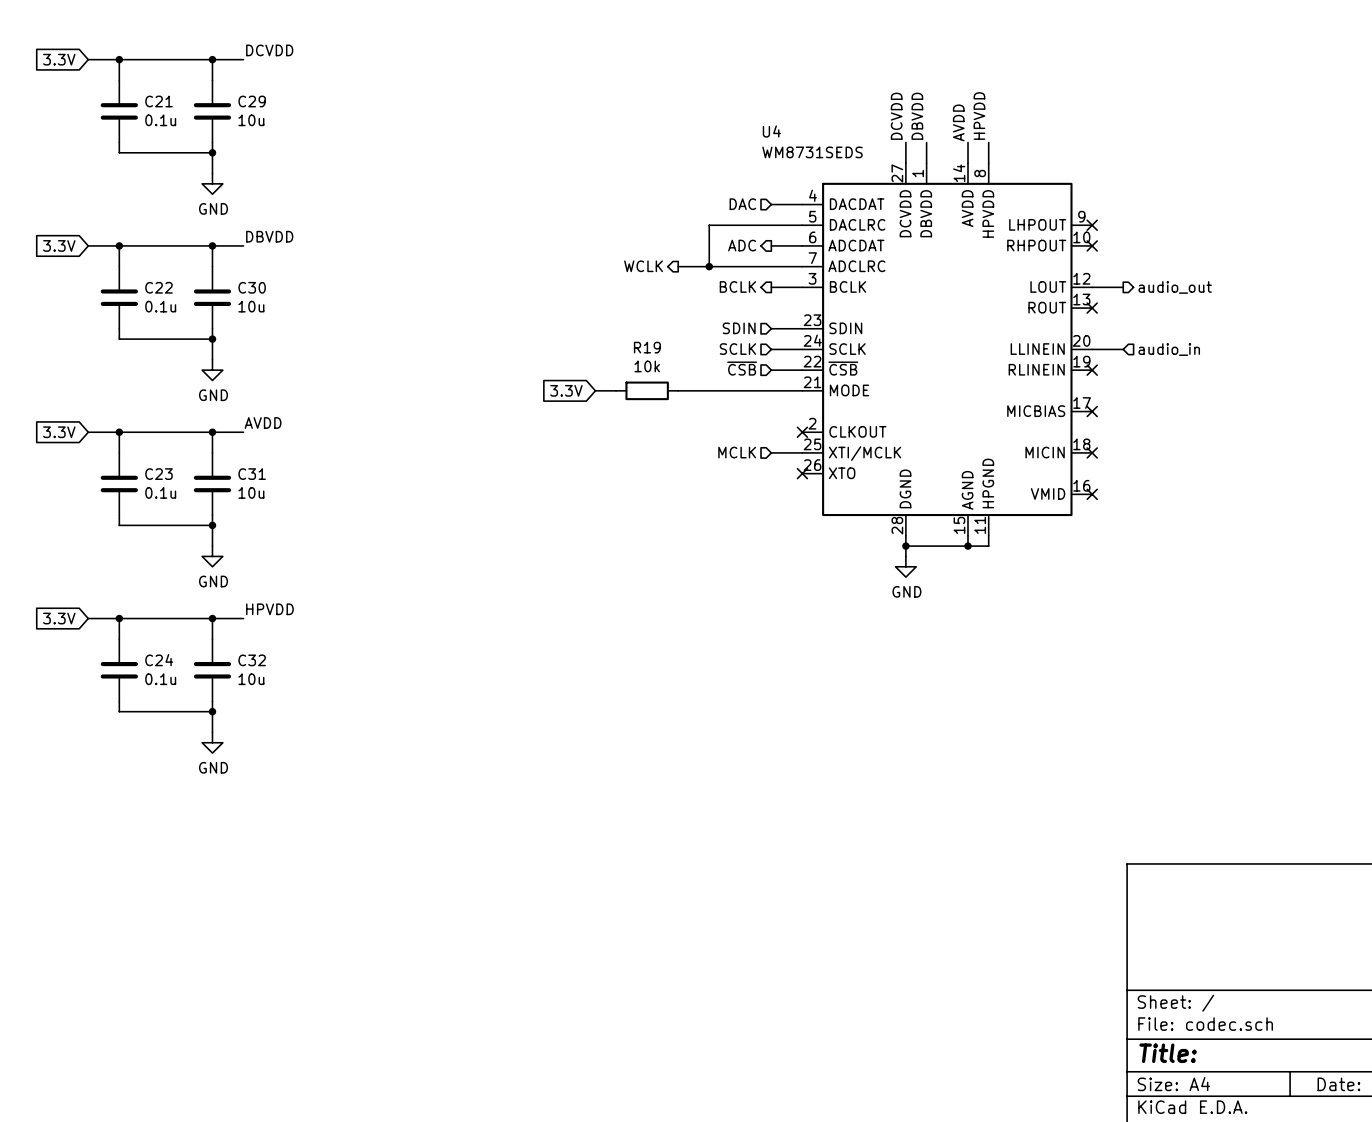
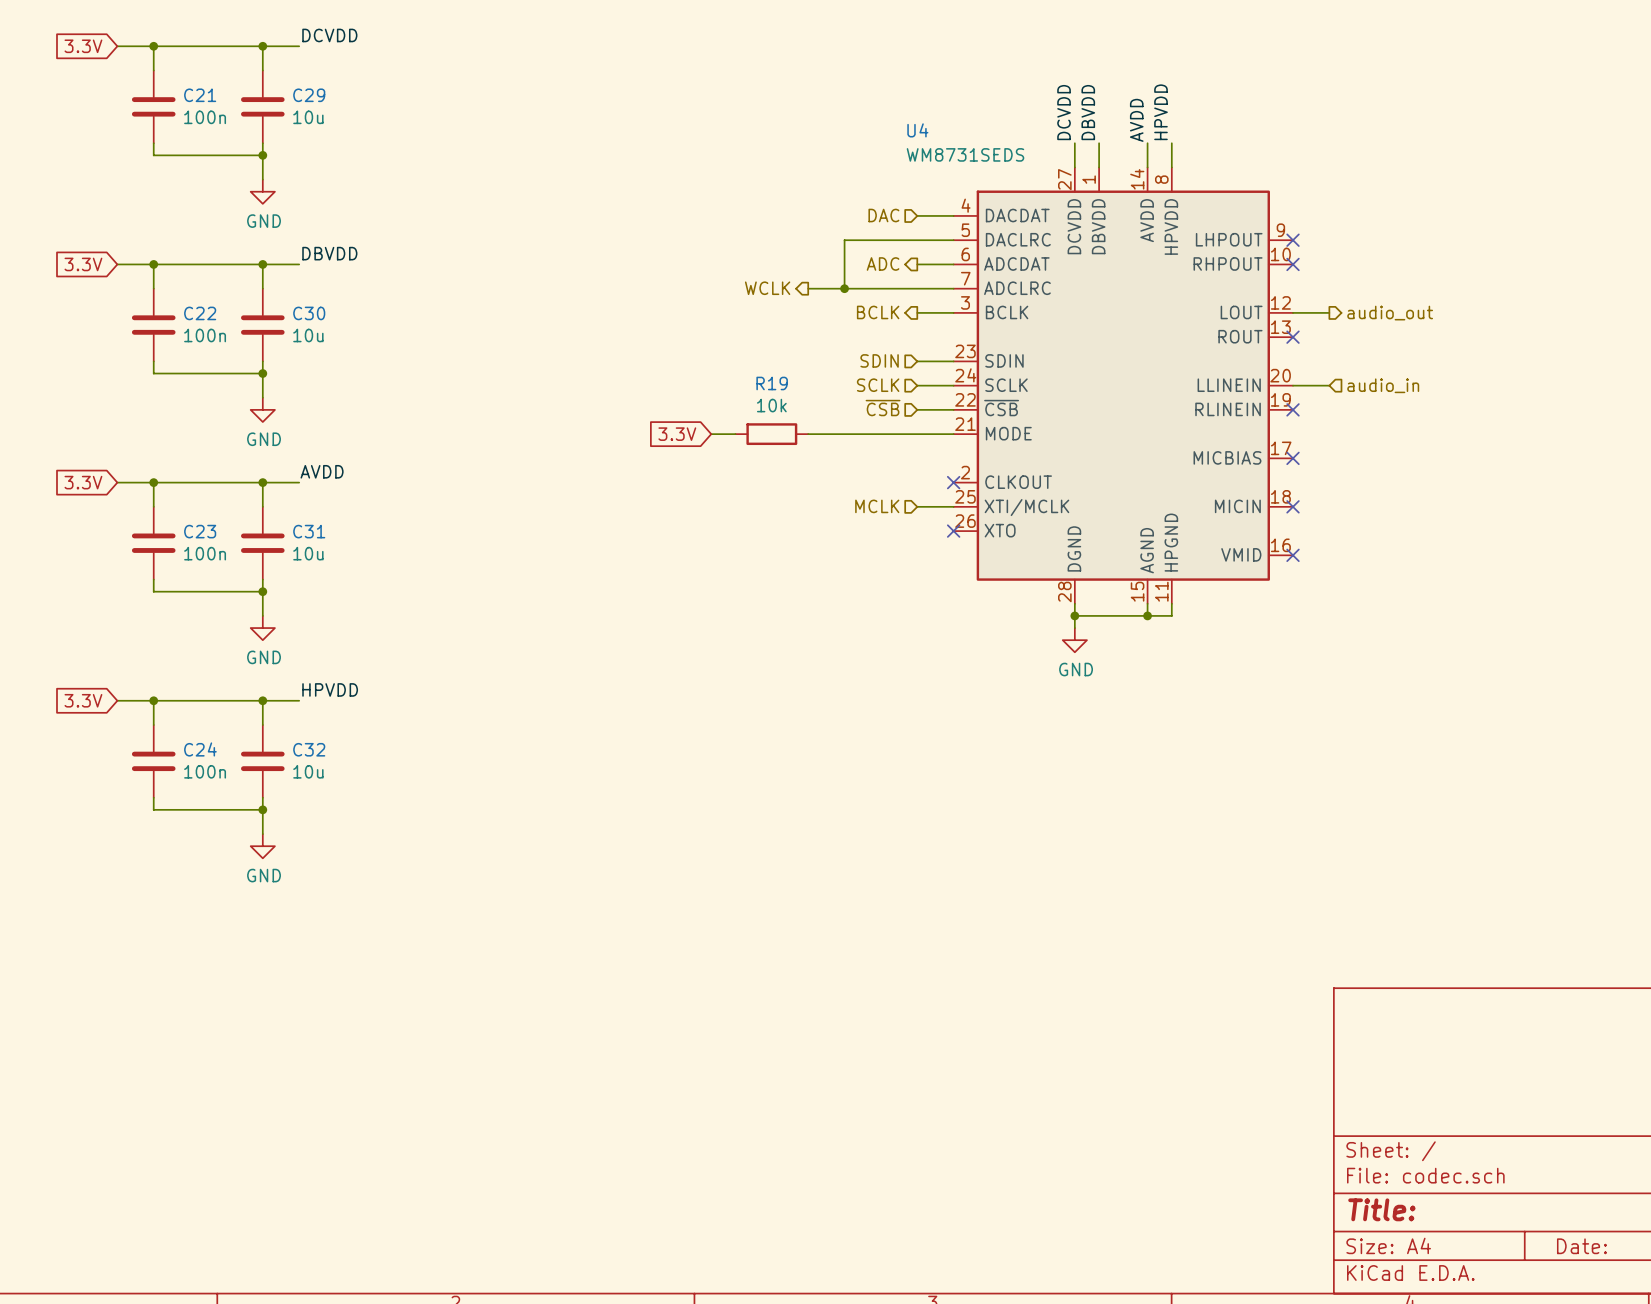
C21 value: 0.1u (160, 120) -> 100n (205, 117)
C22 value: 0.1u (160, 306) -> 100n (205, 335)
C23 value: 0.1u (160, 492) -> 100n (205, 553)
C24 value: 0.1u (160, 679) -> 100n (205, 771)

